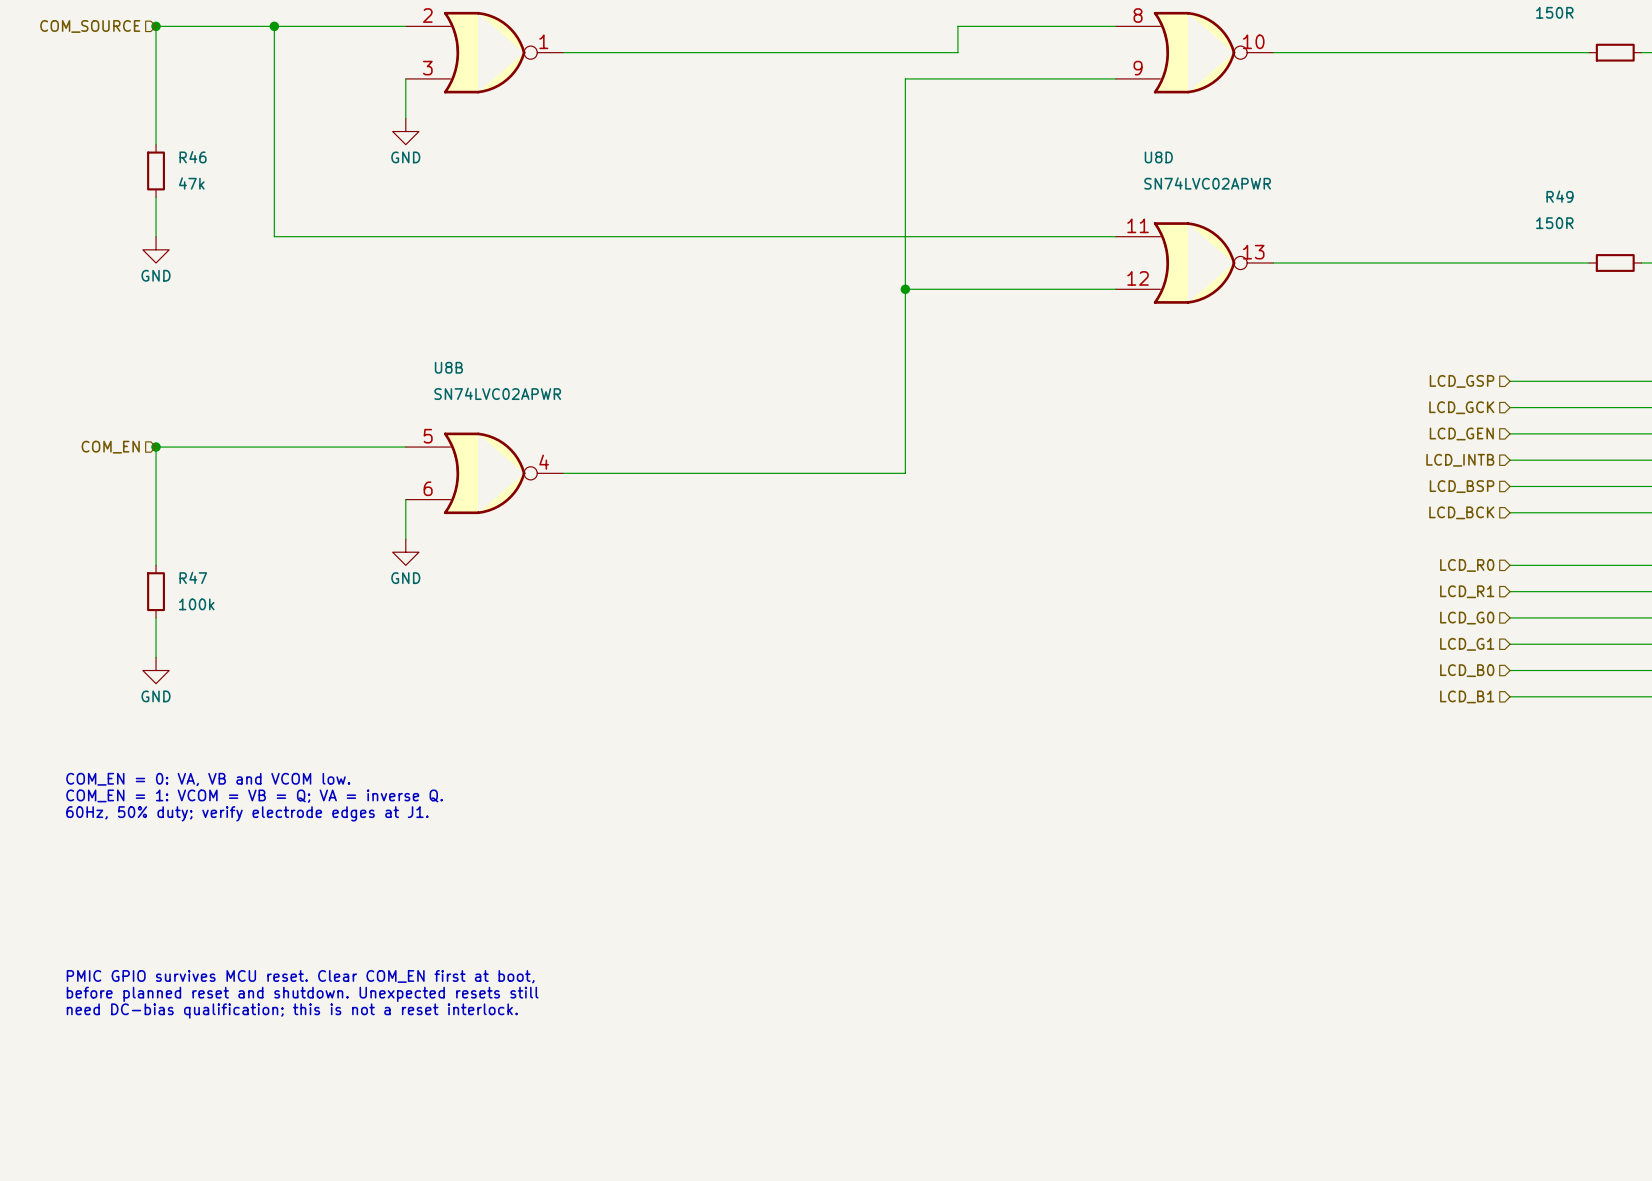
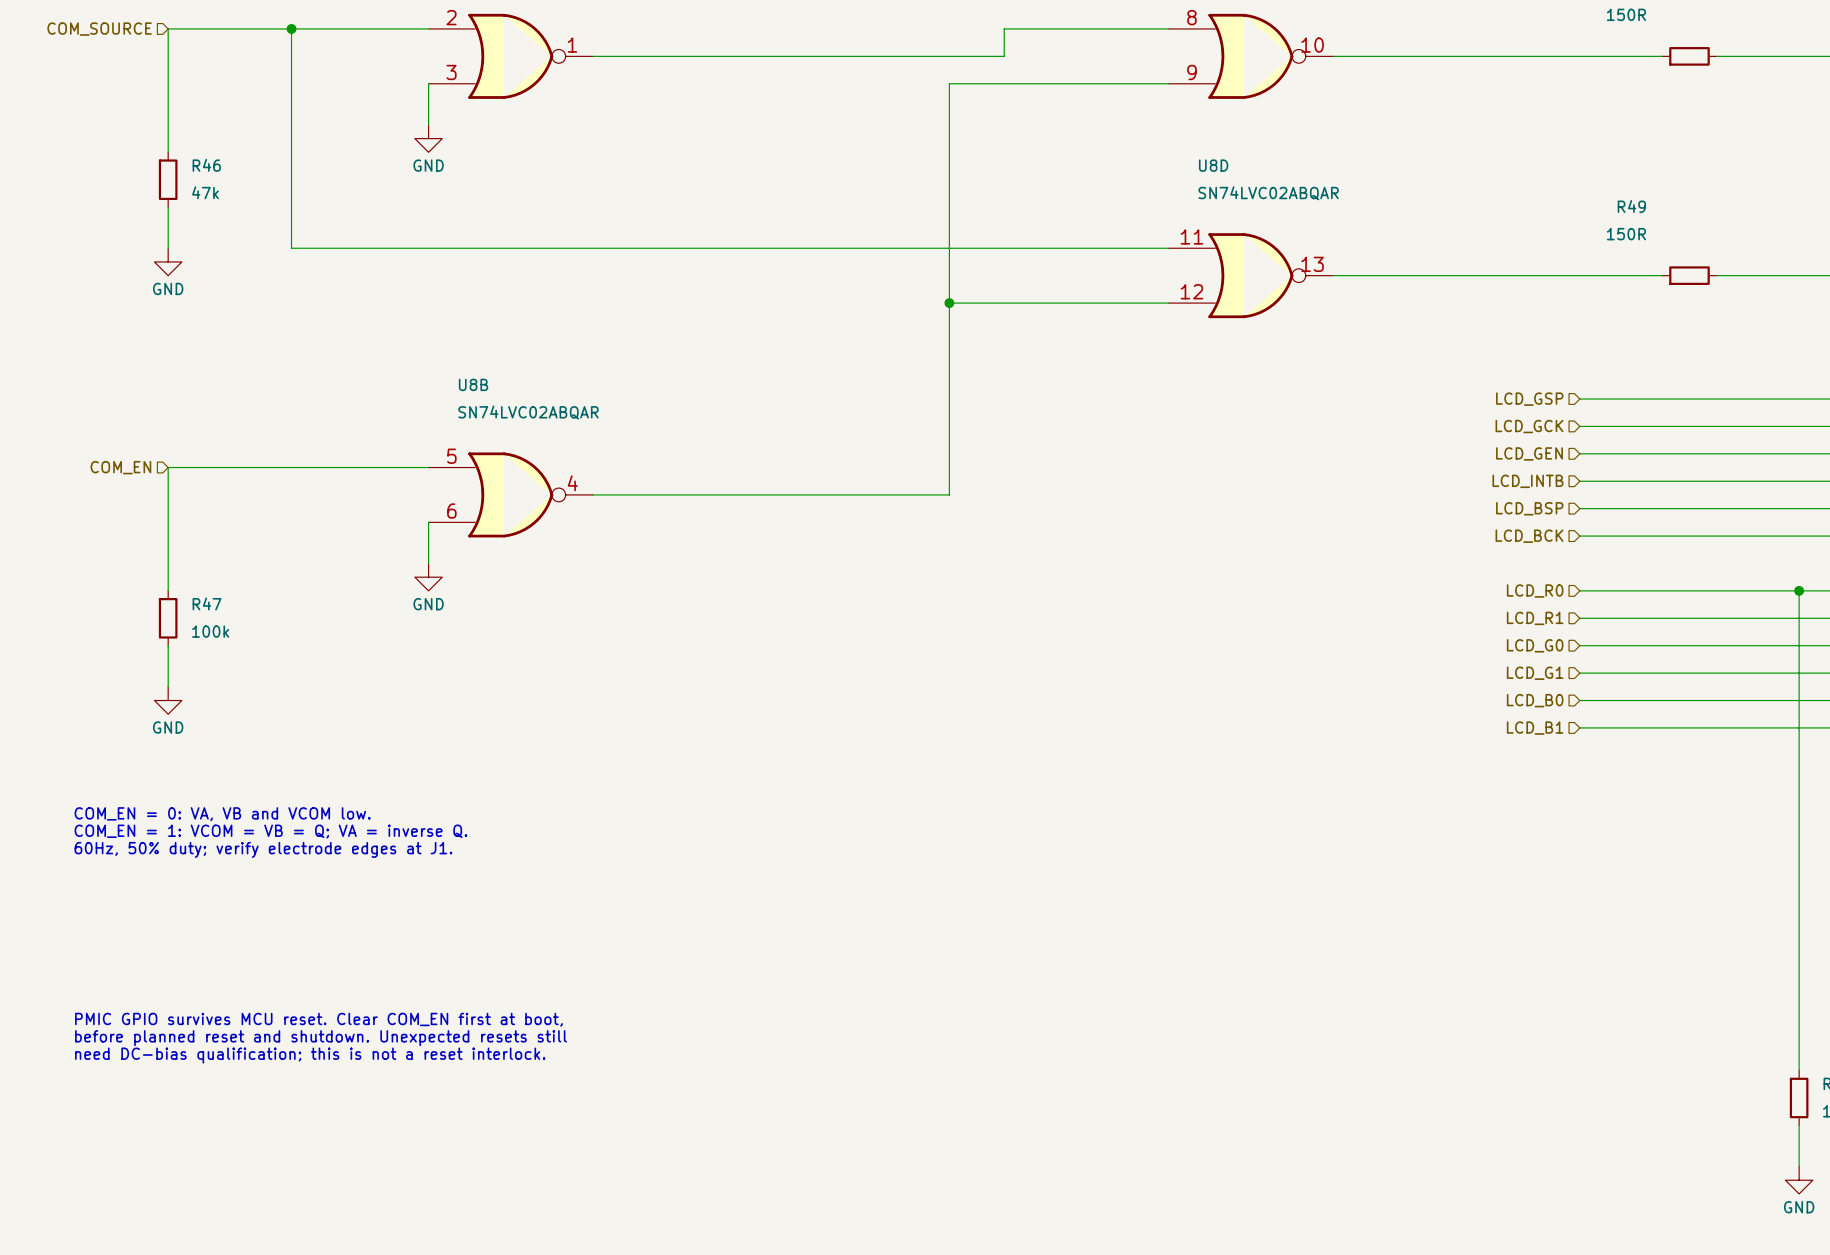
junction: (156, 26) -> none
U8D value: SN74LVC02APWR (1207, 183) -> SN74LVC02ABQAR (1268, 193)
U8B value: SN74LVC02APWR (497, 393) -> SN74LVC02ABQAR (528, 412)
junction: (156, 447) -> none

